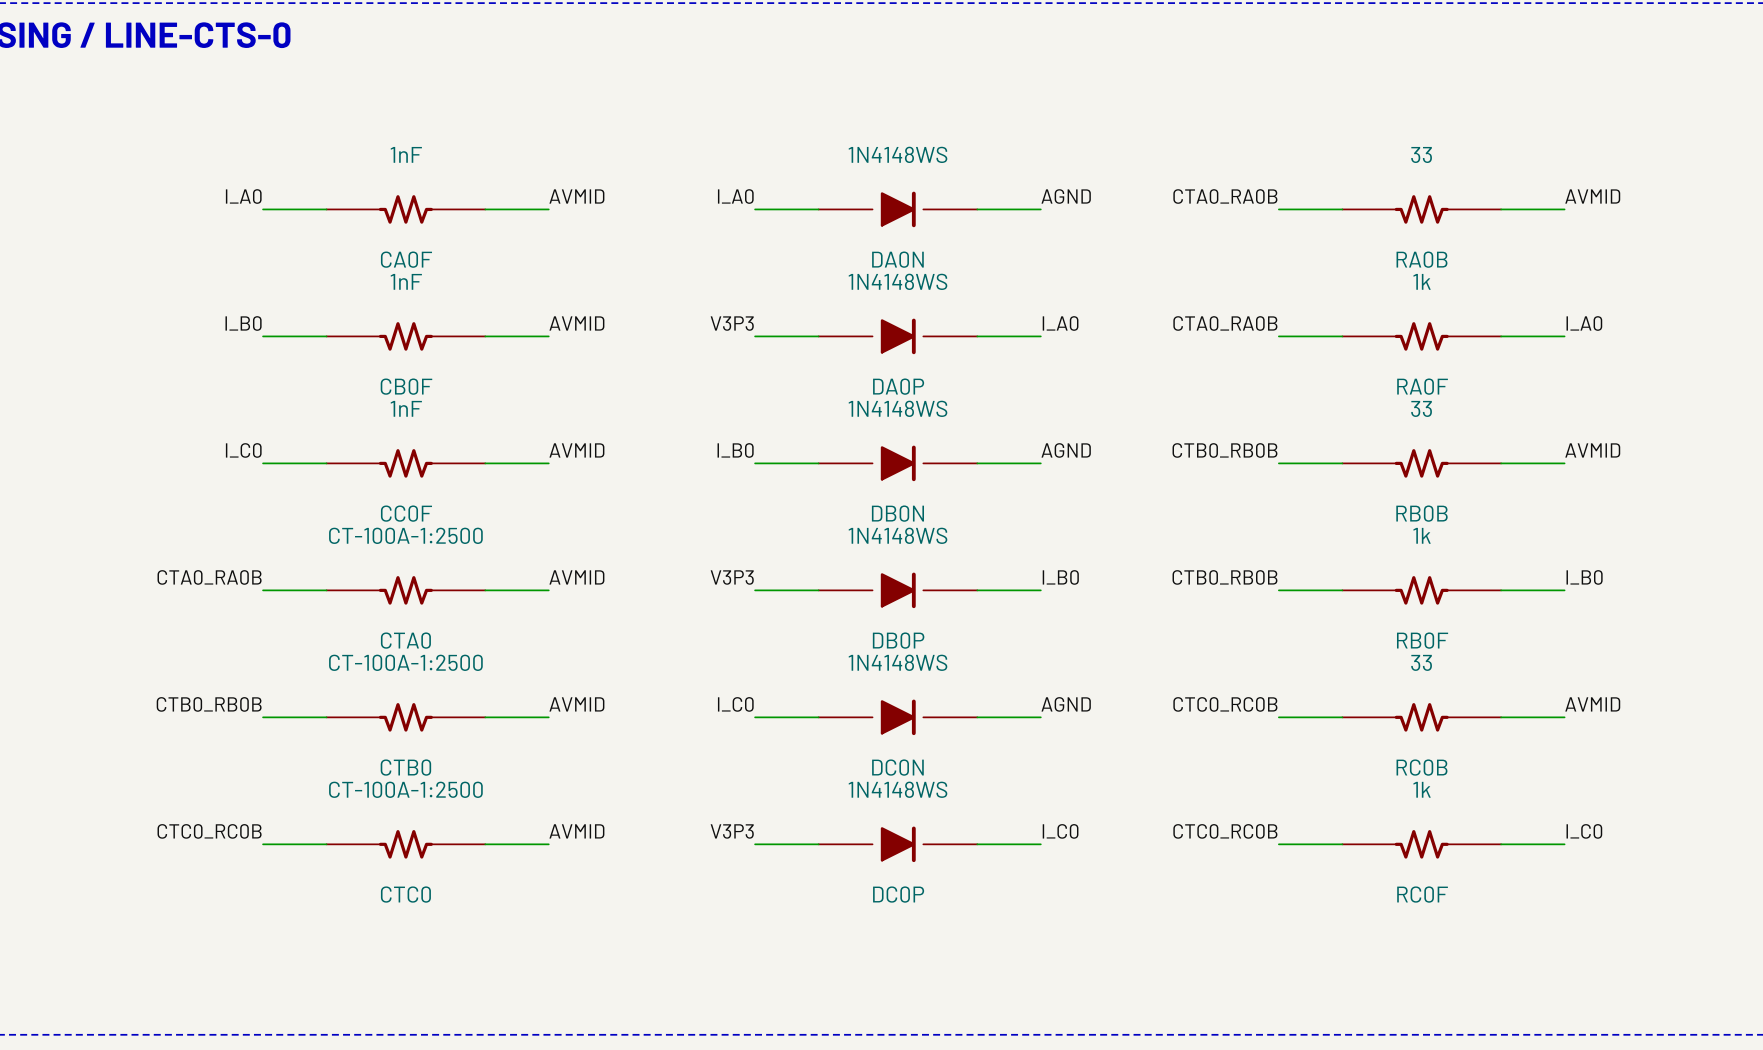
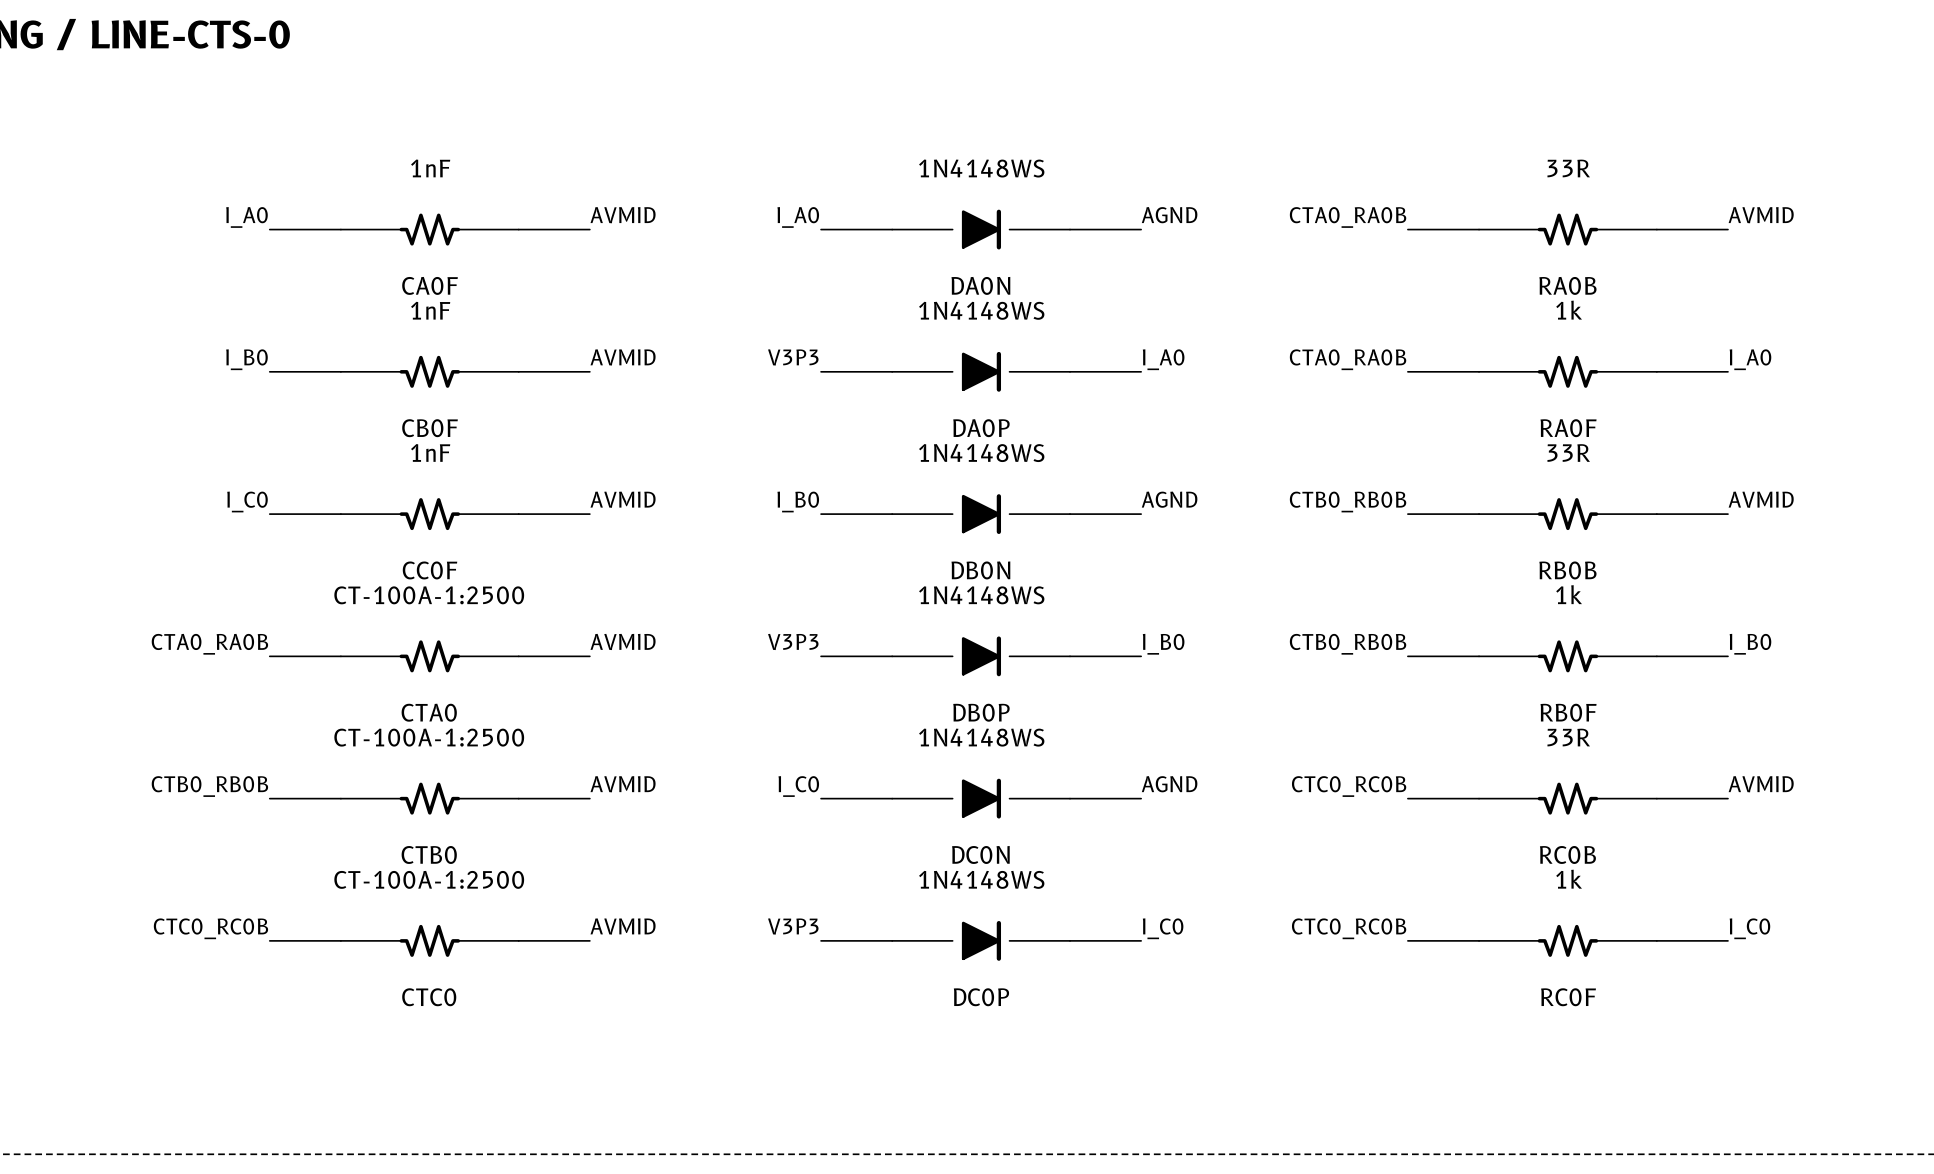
RA0B value: 33 (1421, 154) -> 33R (1568, 168)
RB0B value: 33 (1421, 408) -> 33R (1568, 453)
RC0B value: 33 (1421, 662) -> 33R (1568, 737)

